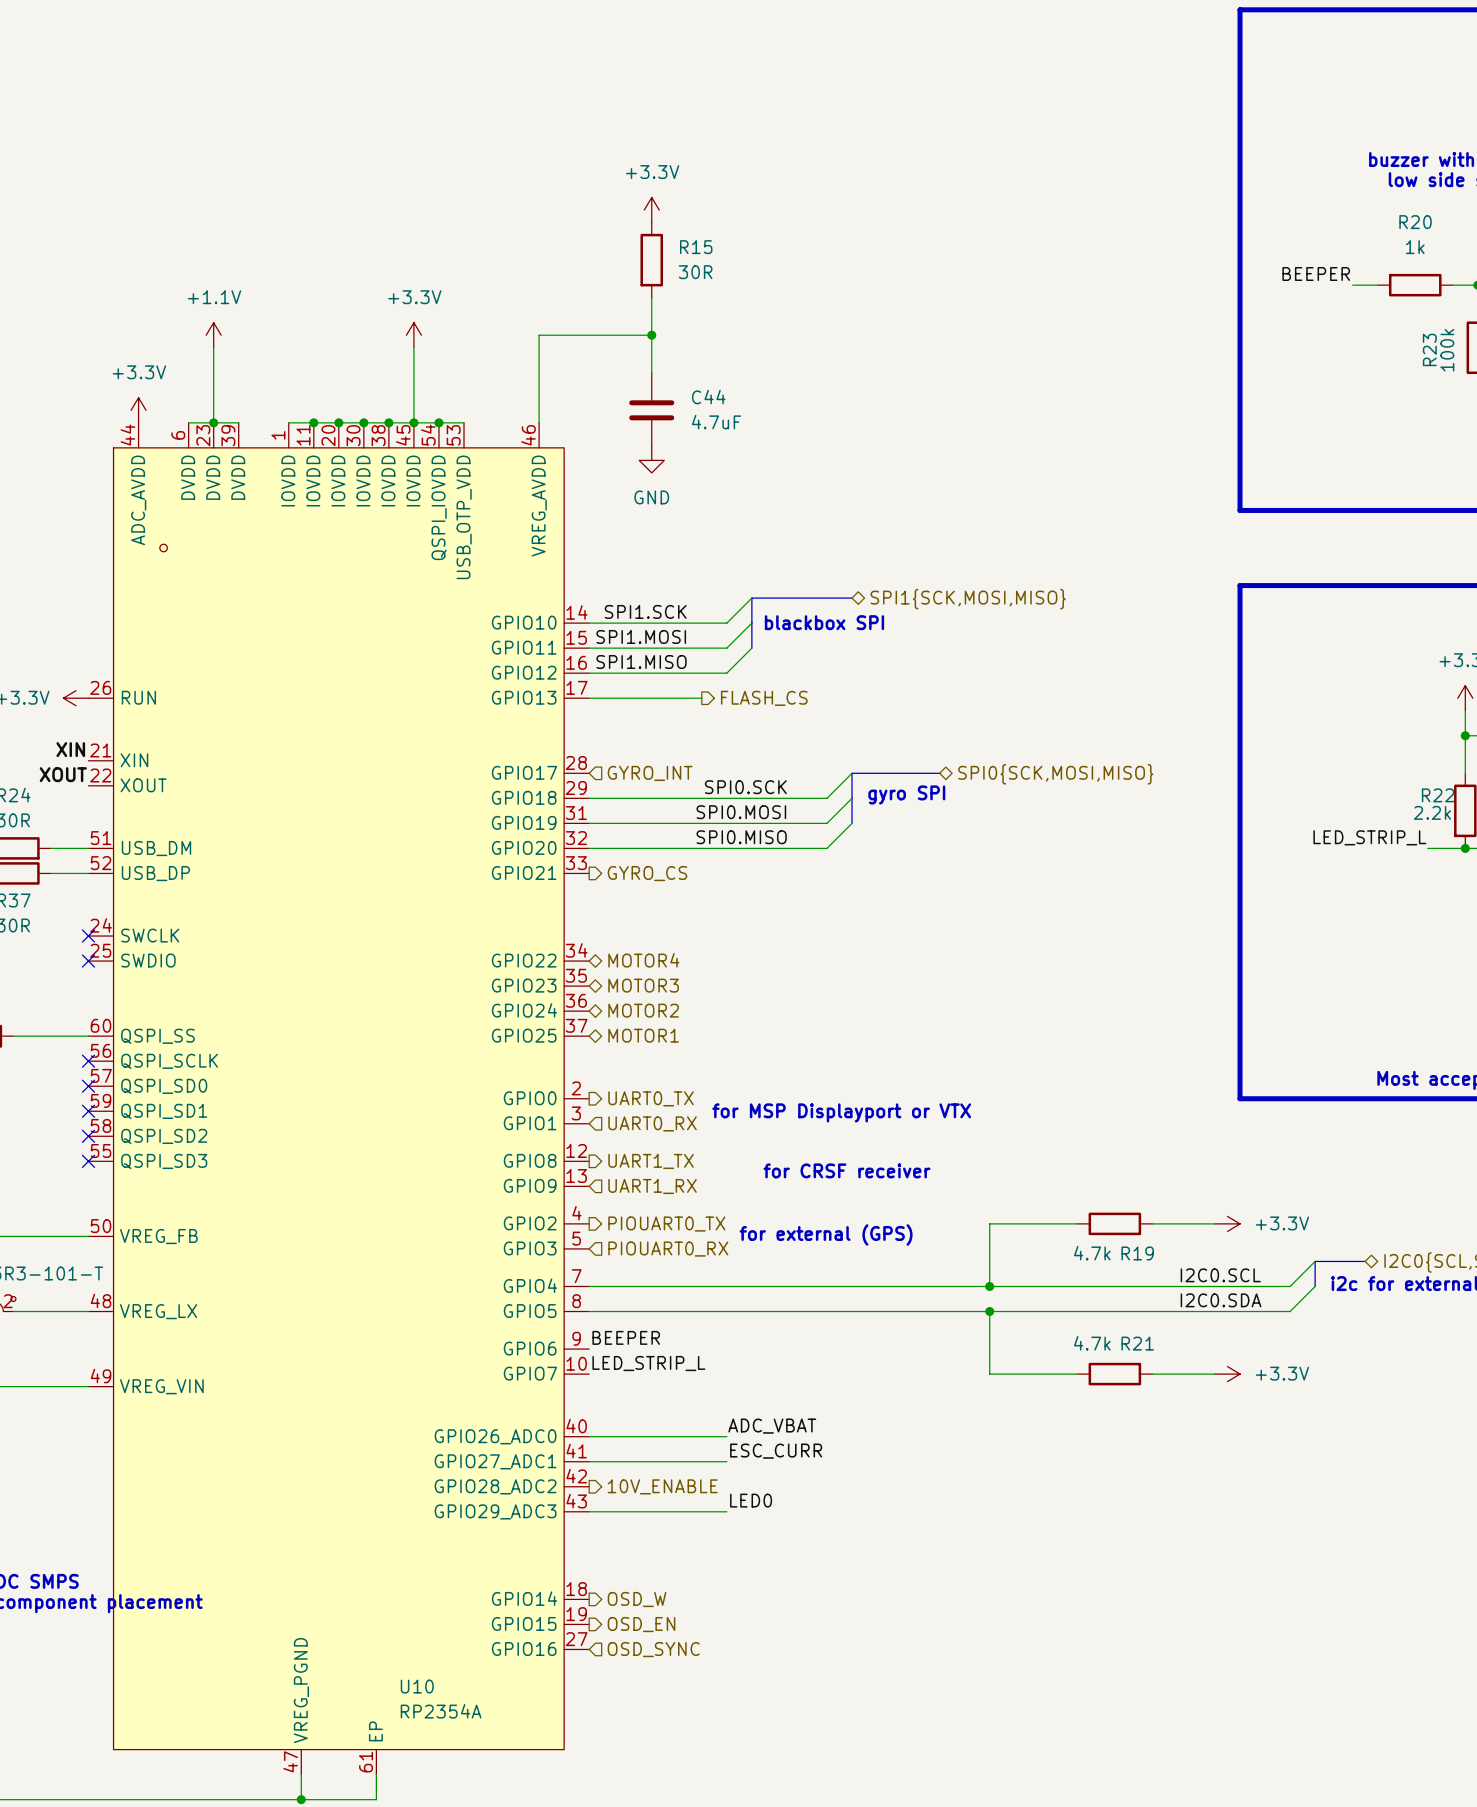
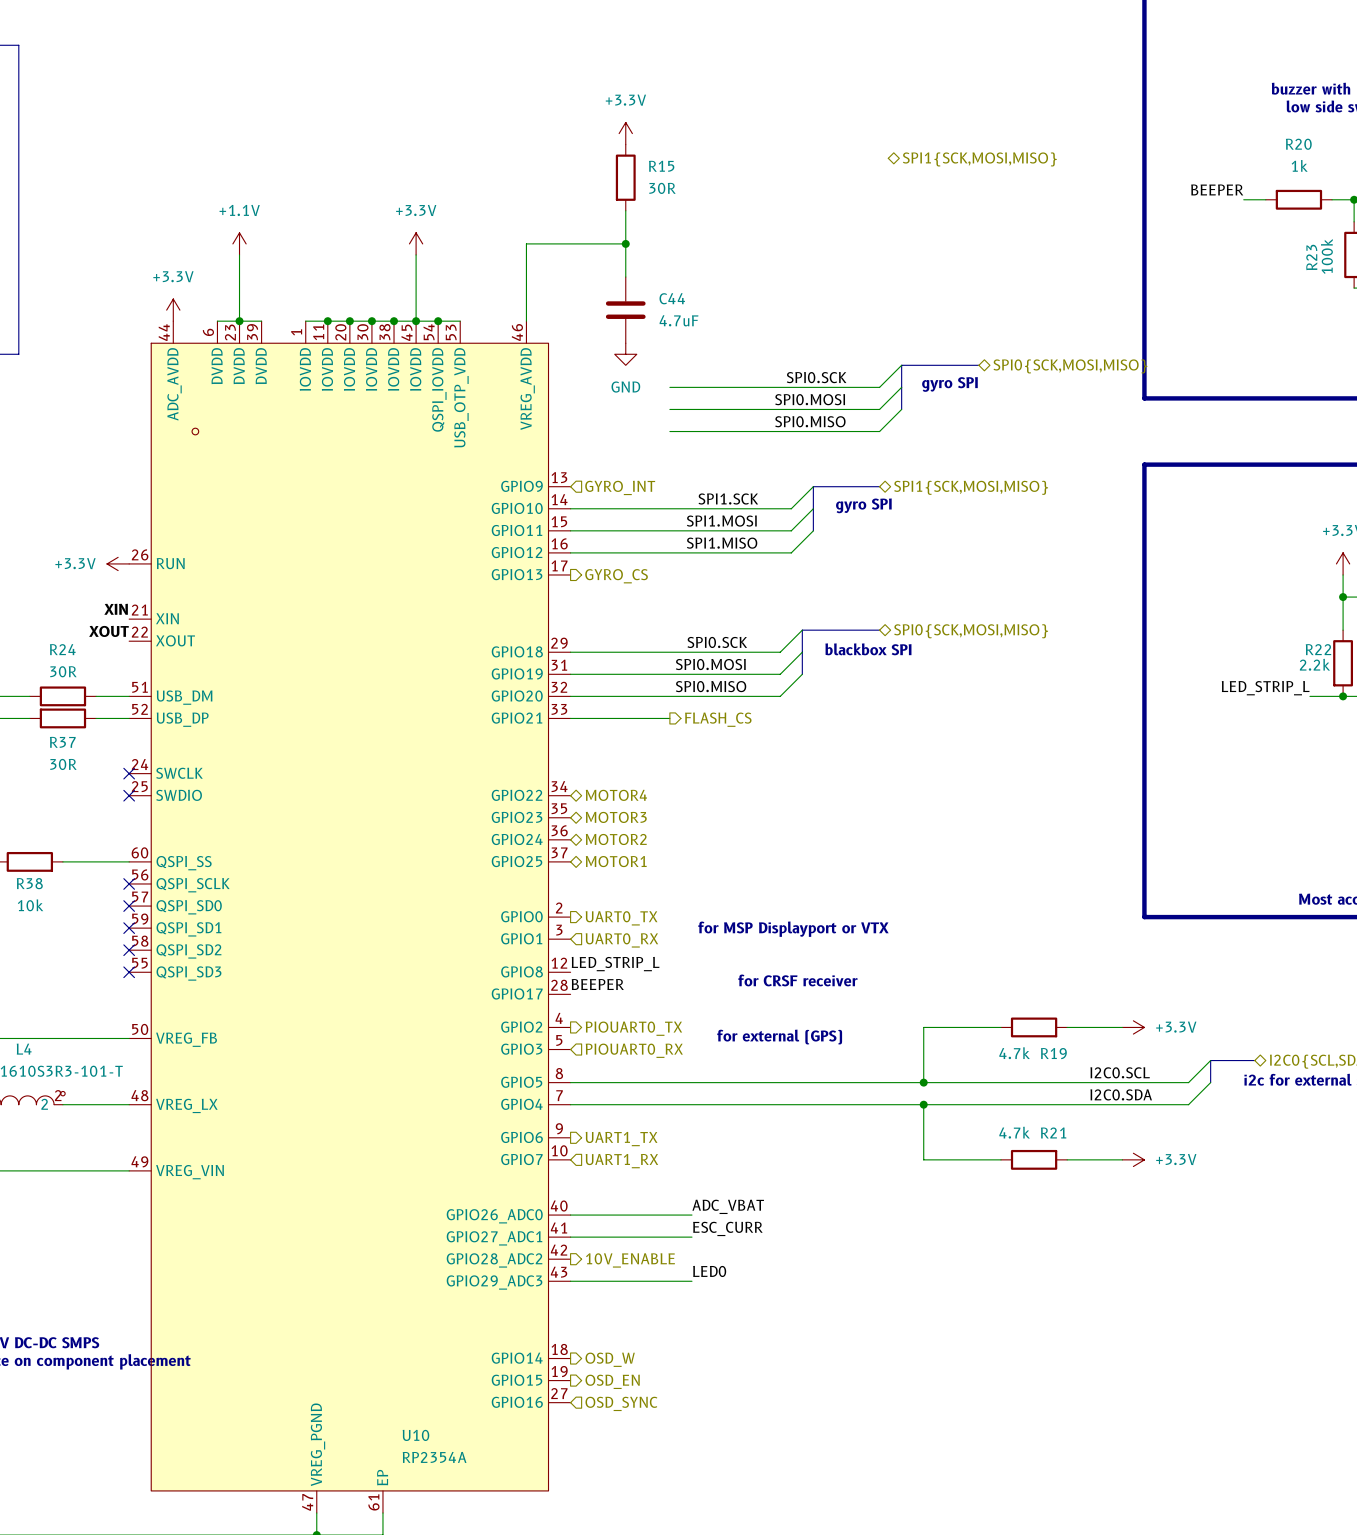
hierarchical label: none -> SPI1{SCK,MOSI,MISO} (979, 159)
U10 symbol: [88, 422, 590, 1775] -> [129, 321, 571, 1514]
wire: none -> (901, 365) (879, 387) (669, 387)
bus: none -> (978, 365) (901, 365) (901, 409)
hierarchical label: none -> SPI0{SCK,MOSI,MISO} (1070, 366)
label: none -> SPI0.SCK (816, 377)
text: none -> gyro SPI (949, 384)
wire: none -> (901, 387) (879, 409) (669, 409)
label: none -> SPI0.MOSI (810, 399)
wire: none -> (901, 409) (879, 431) (669, 431)
label: none -> SPI0.MISO (810, 421)
wire: (751, 598) (726, 623) (589, 623) -> none
bus: (852, 598) (751, 598) (751, 648) -> none
hierarchical label position: SPI1{SCK,MOSI,MISO} (968, 599) -> SPI1{SCK,MOSI,MISO} (971, 487)
wire: none -> (813, 486) (791, 508) (570, 508)
bus: none -> (879, 486) (813, 486) (813, 530)
label position: SPI1.SCK (645, 611) -> SPI1.SCK (728, 498)
text position: blackbox SPI (824, 622) -> blackbox SPI (868, 649)
wire: (751, 623) (726, 648) (589, 648) -> none
text: none -> gyro SPI (863, 505)
wire: none -> (813, 508) (791, 530) (570, 530)
label position: SPI1.MOSI (641, 636) -> SPI1.MOSI (721, 521)
wire: (751, 648) (726, 673) (589, 673) -> none
wire: none -> (813, 530) (791, 552) (570, 552)
label position: SPI1.MISO (641, 662) -> SPI1.MISO (722, 543)
wire: (589, 698) (701, 698) -> (570, 718) (669, 718)
hierarchical label position: FLASH_CS (764, 698) -> FLASH_CS (718, 719)
hierarchical label position: GYRO_INT (650, 773) -> GYRO_INT (620, 487)
text: gyro SPI (906, 794) -> none
hierarchical label position: GYRO_CS (647, 873) -> GYRO_CS (616, 576)
hierarchical label position: UART1_TX (651, 1161) -> UART1_TX (621, 1139)
hierarchical label position: UART1_RX (652, 1186) -> UART1_RX (621, 1161)
label position: BEEPER (626, 1337) -> BEEPER (597, 984)
label position: LED_STRIP_L (648, 1363) -> LED_STRIP_L (615, 964)

